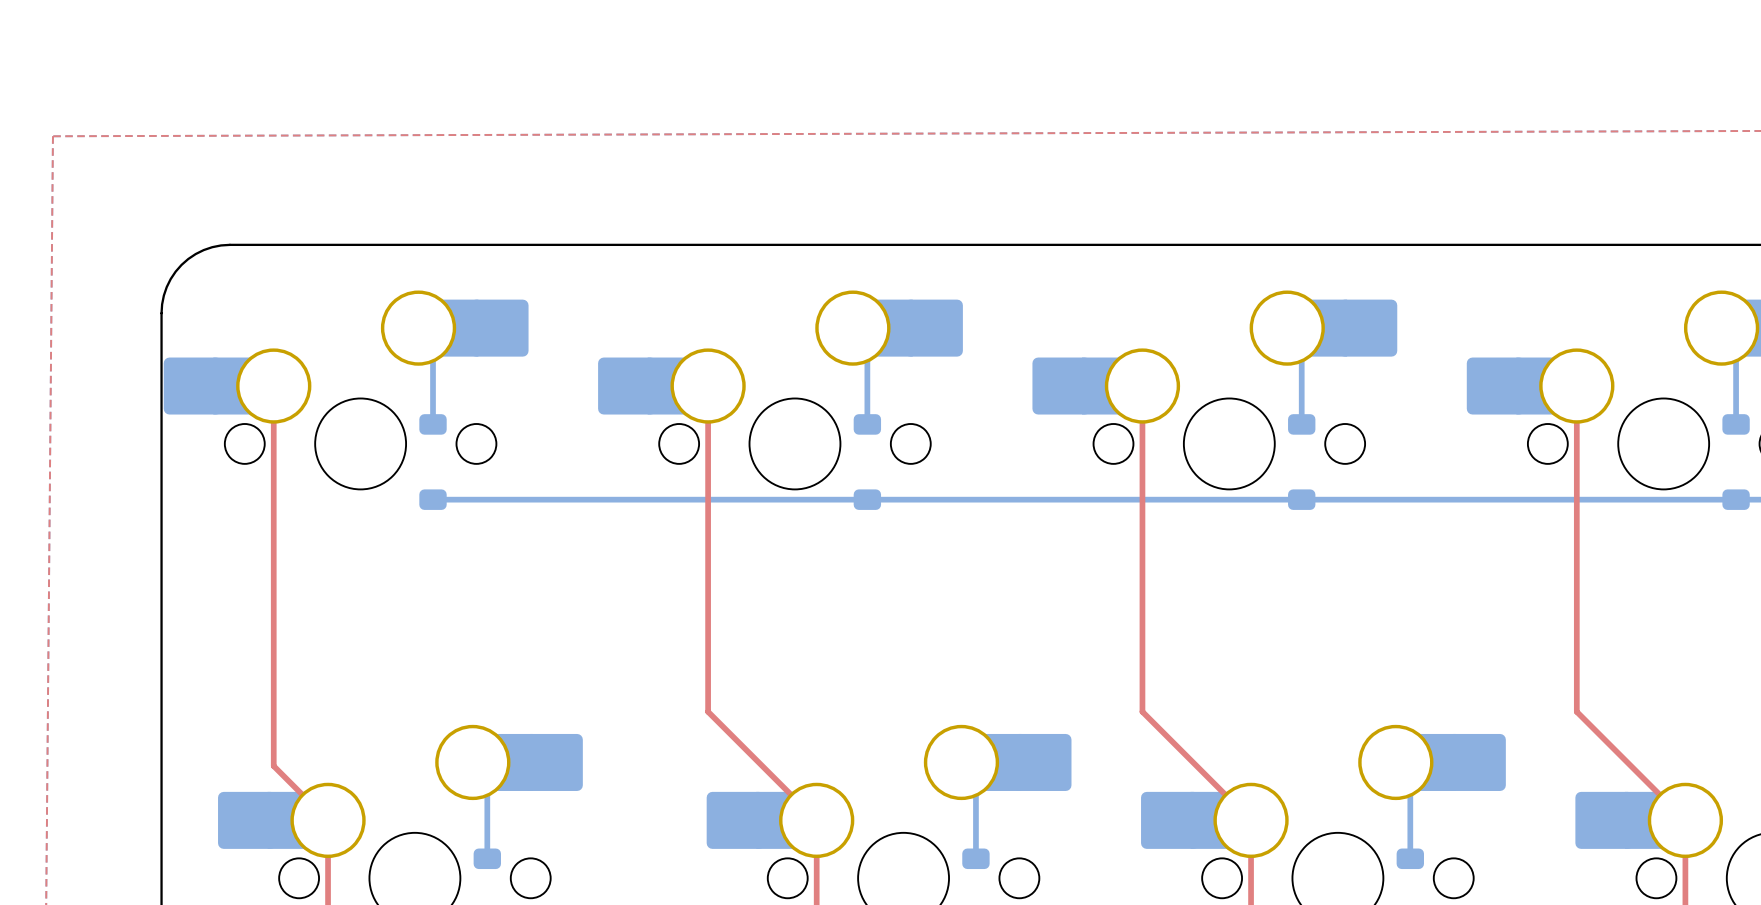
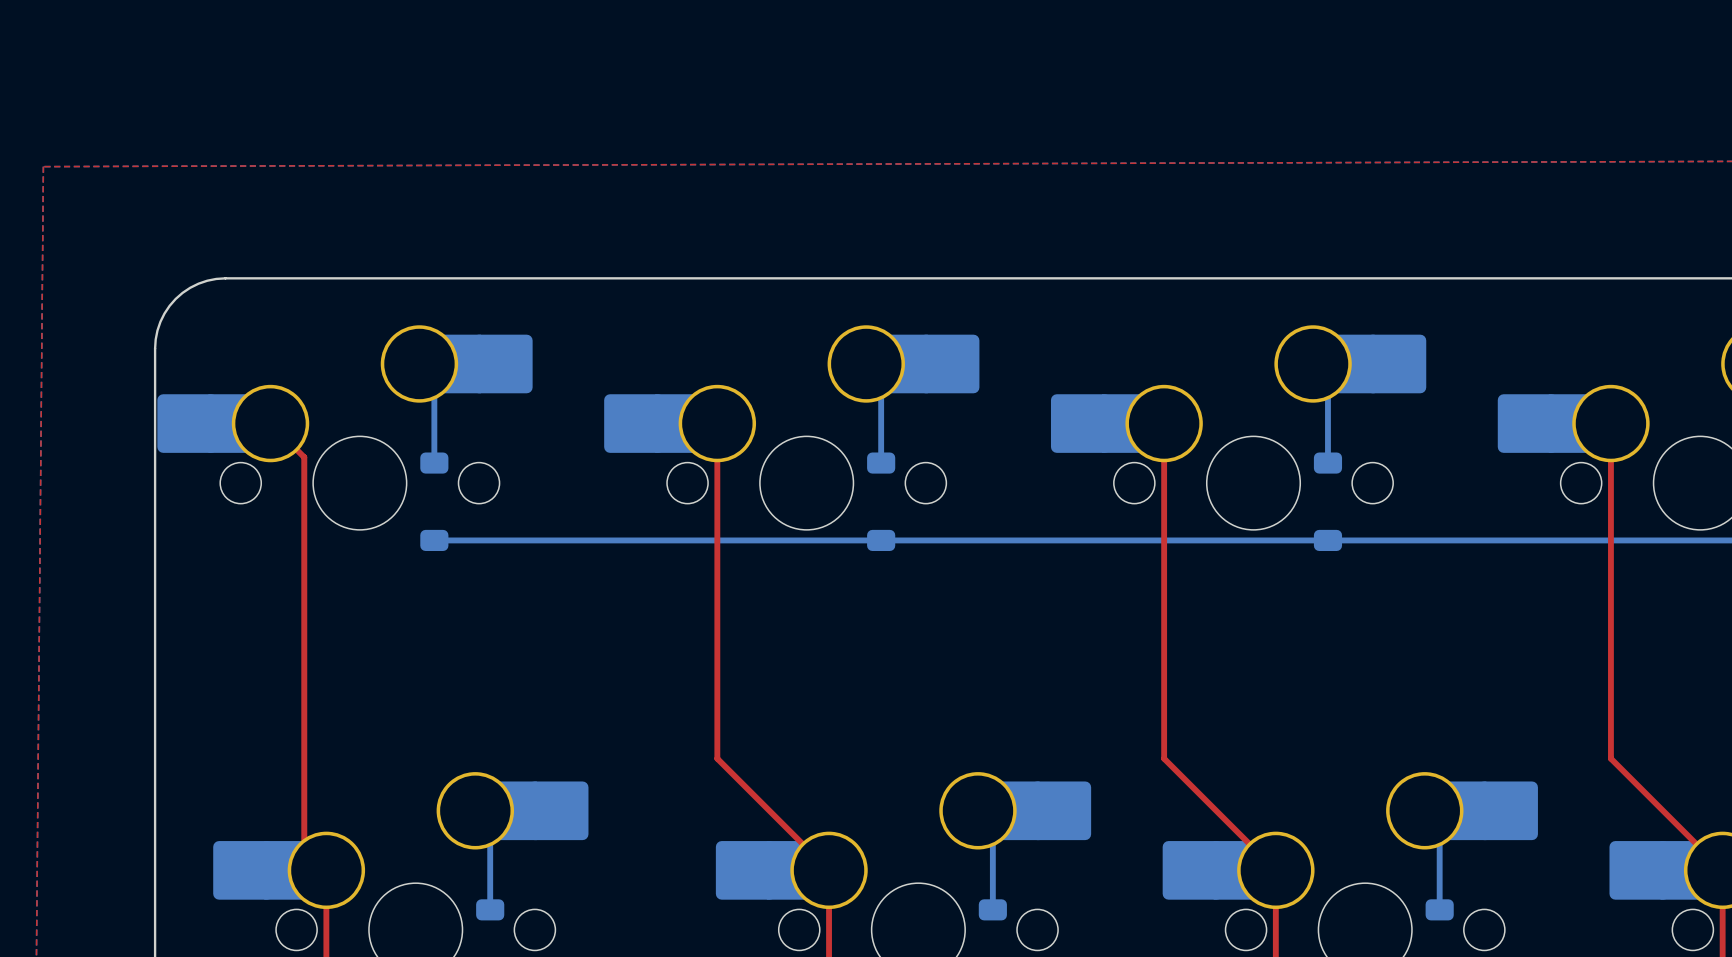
top track: (273, 386) (273, 766) (306, 798) -> (270, 423) (304, 457) (304, 848)

